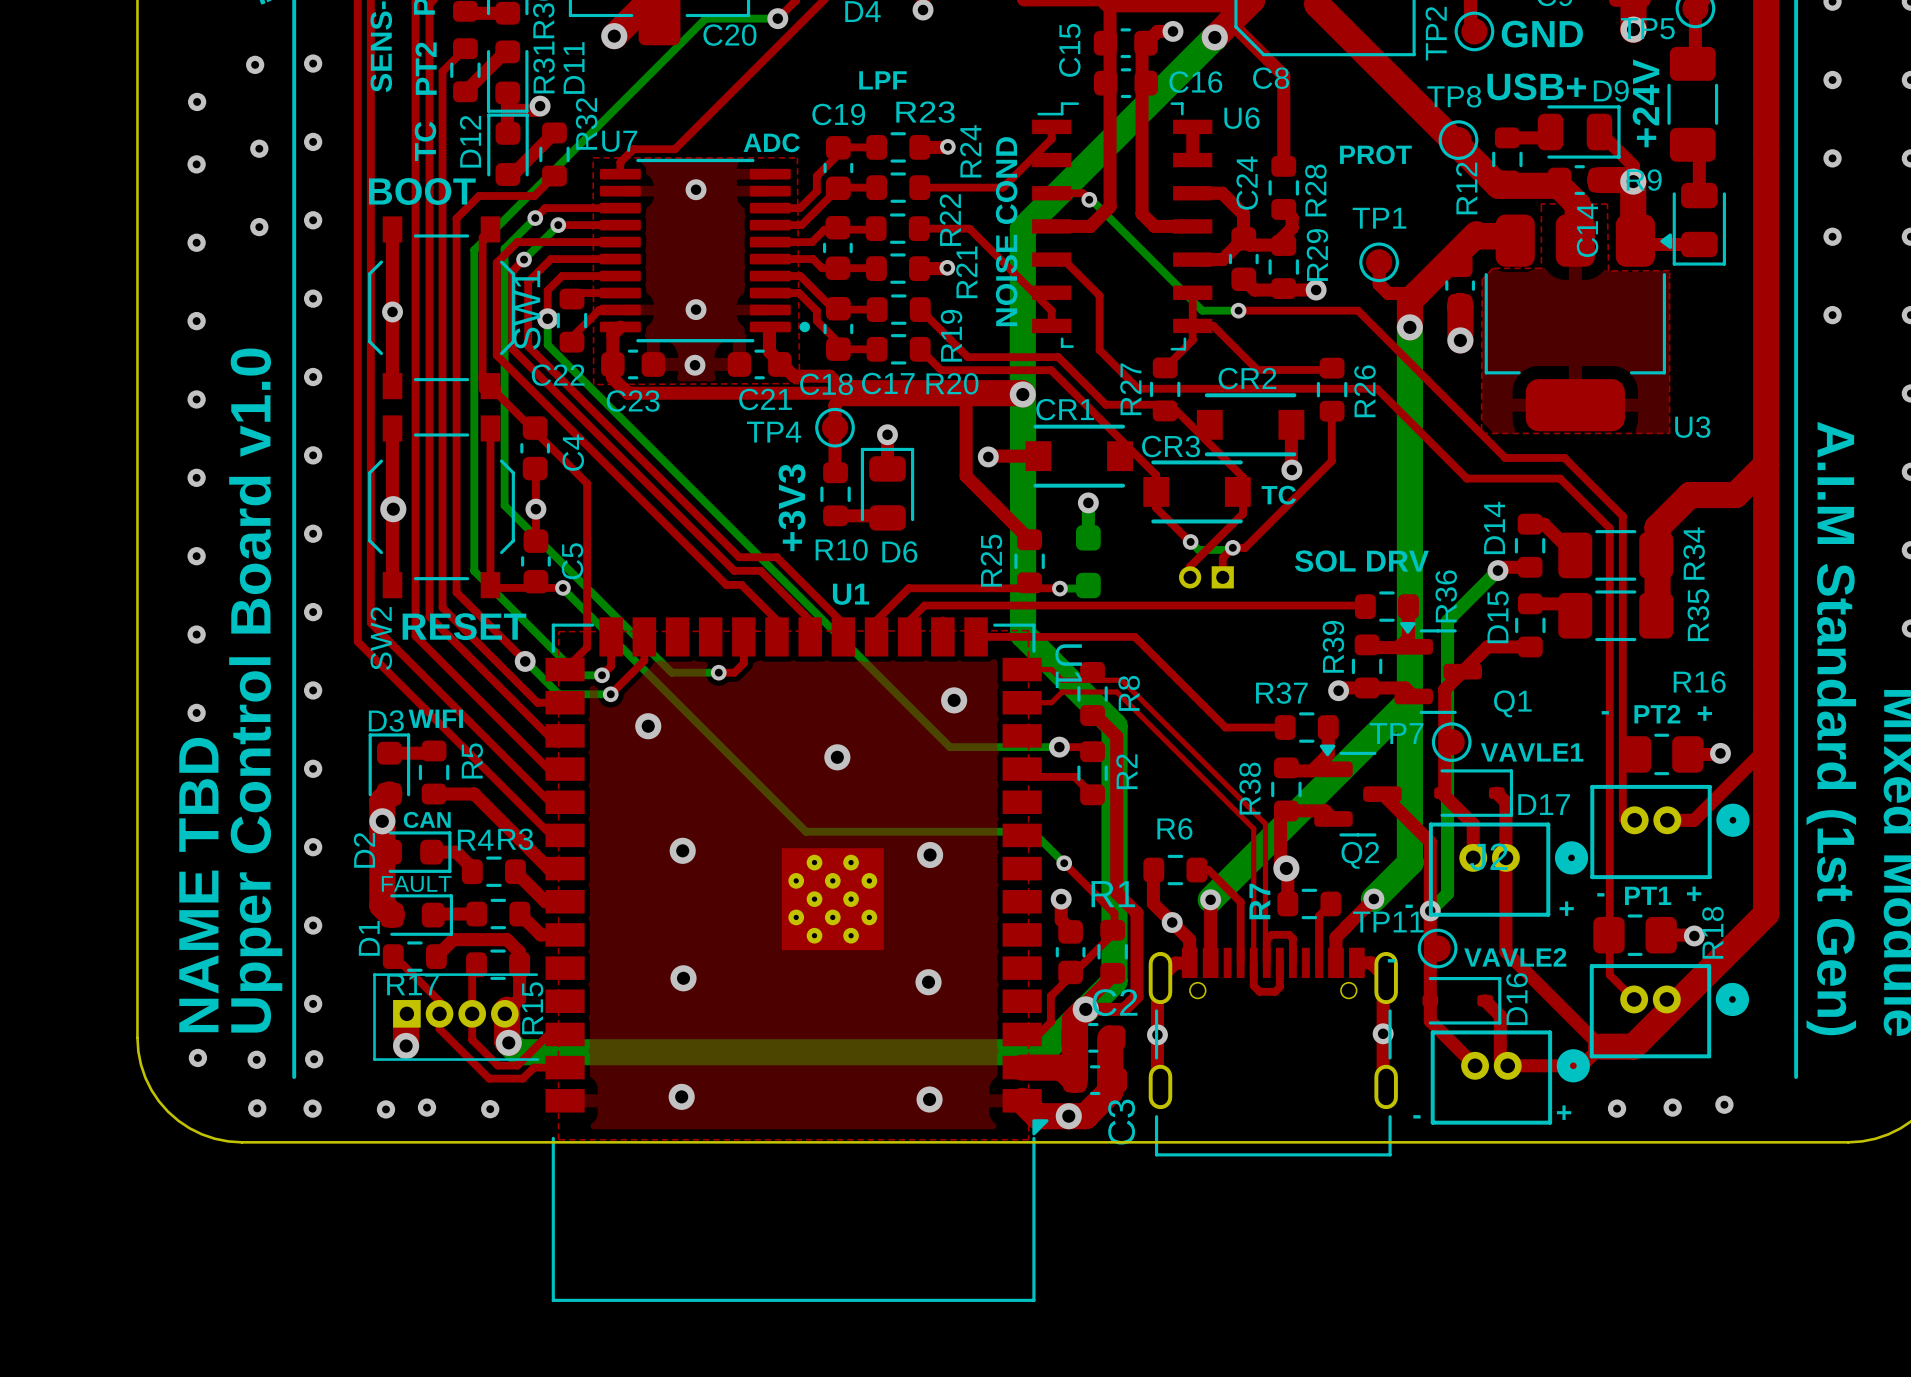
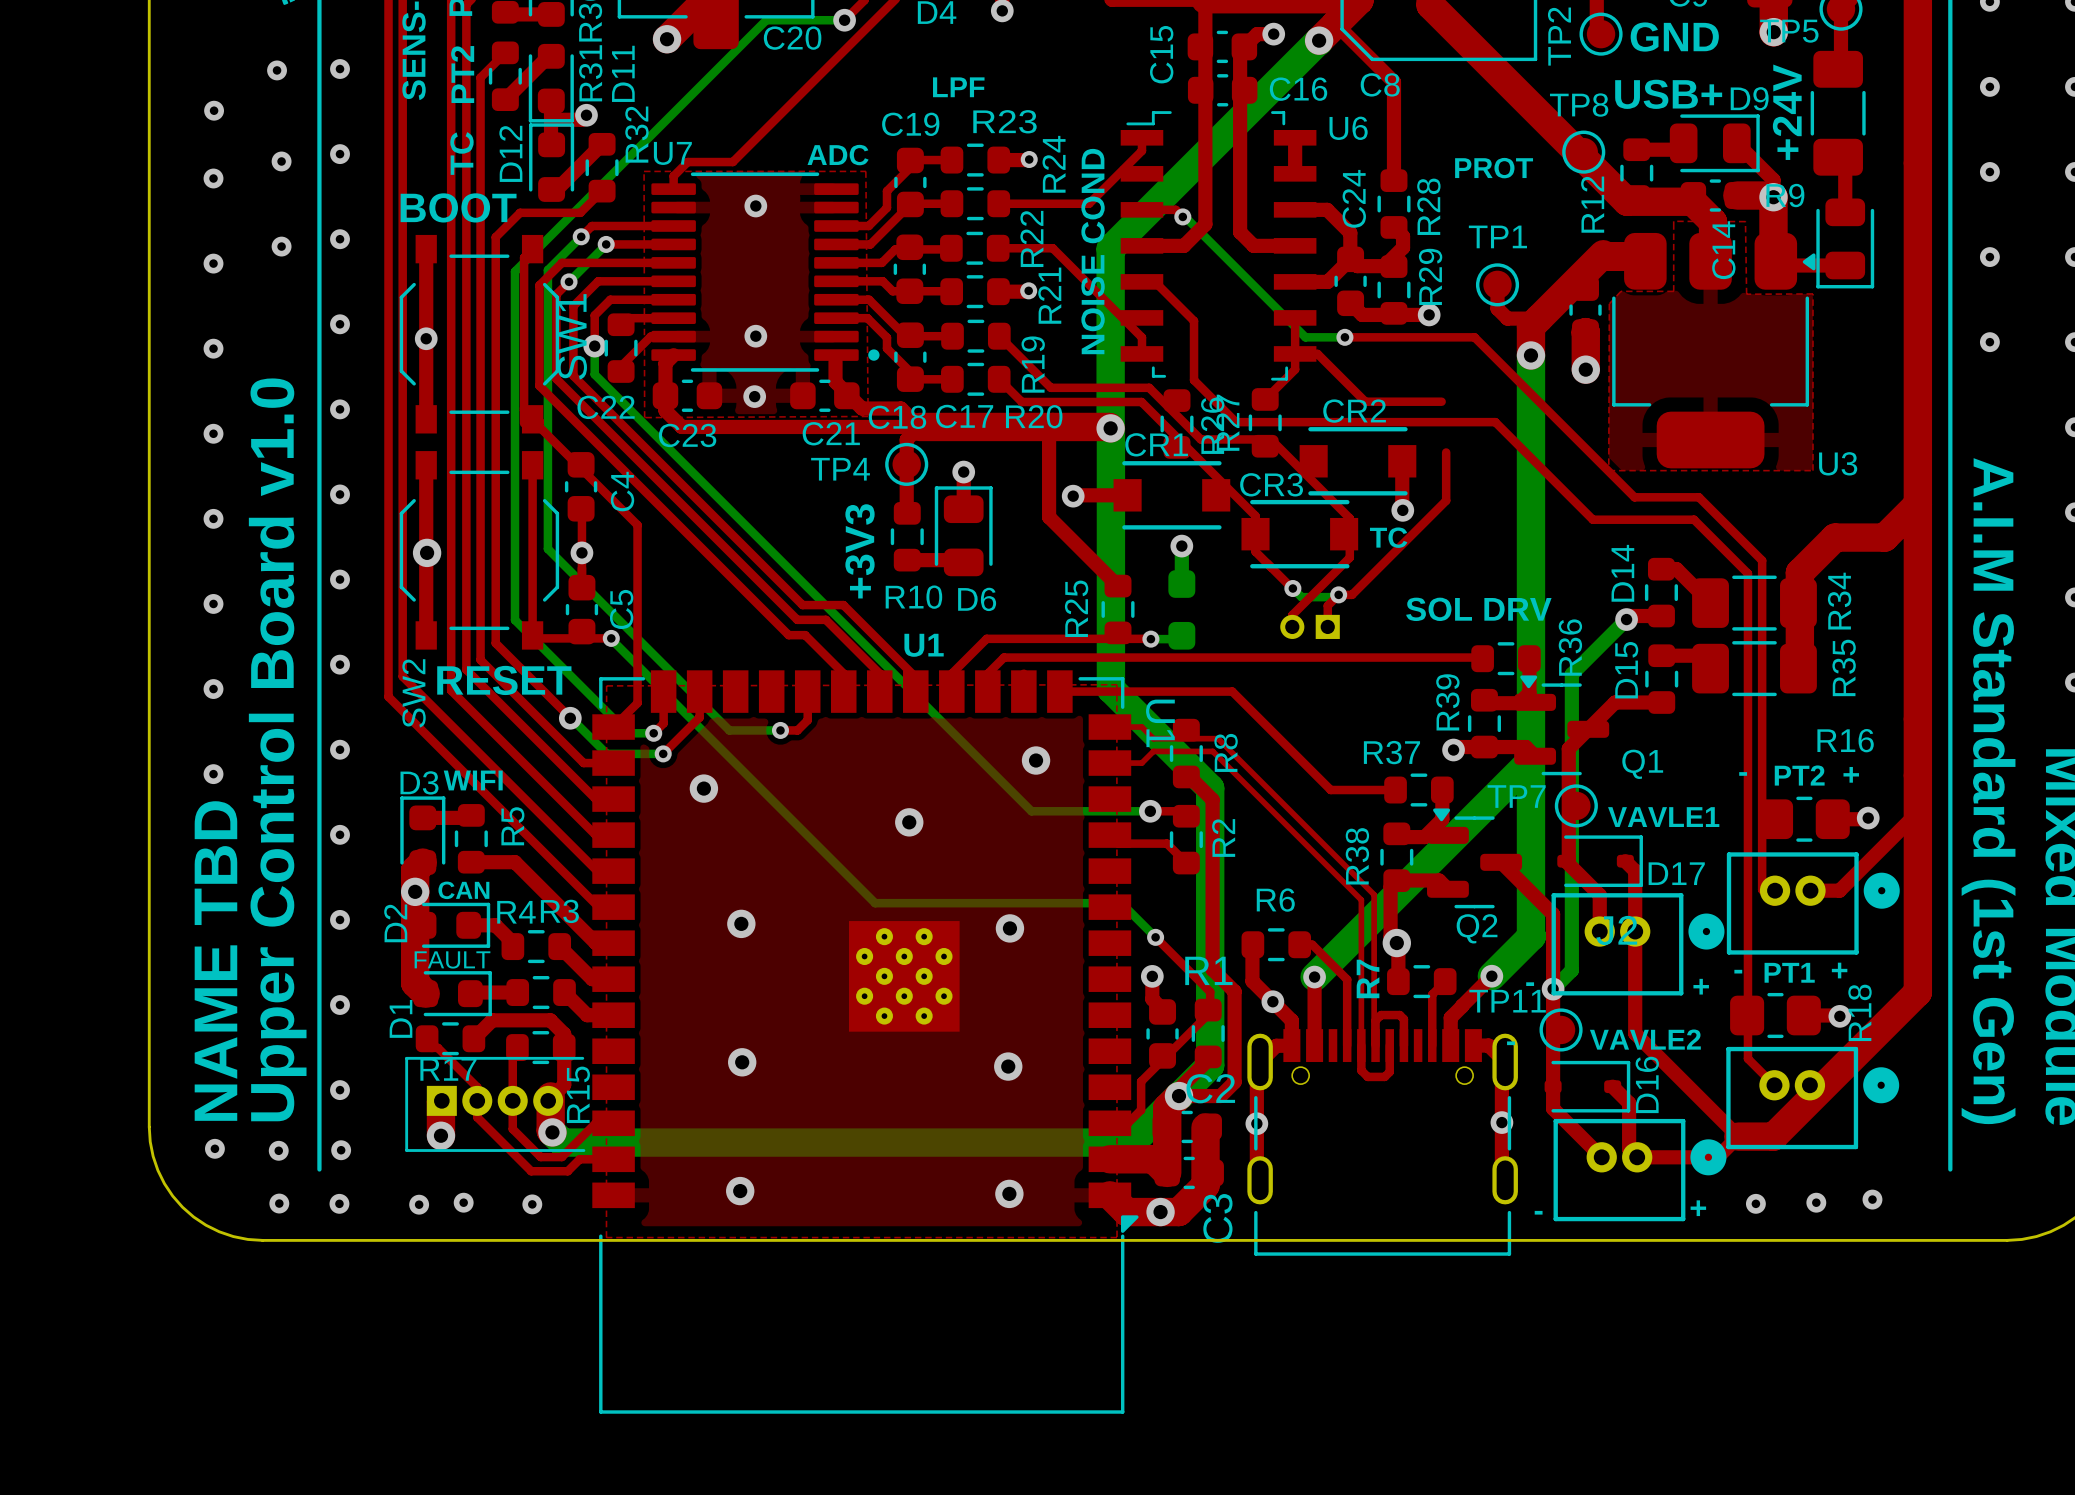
R26 position: (1332, 389) -> (1177, 423)

